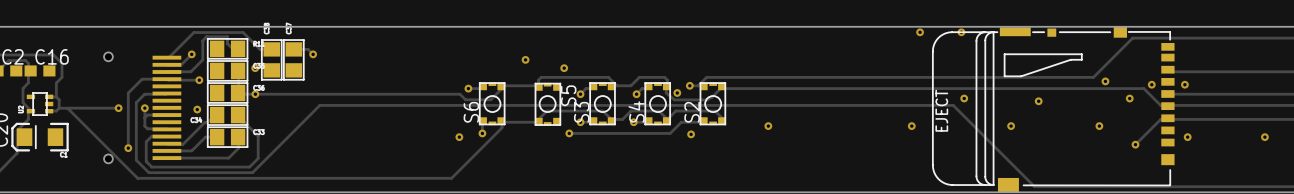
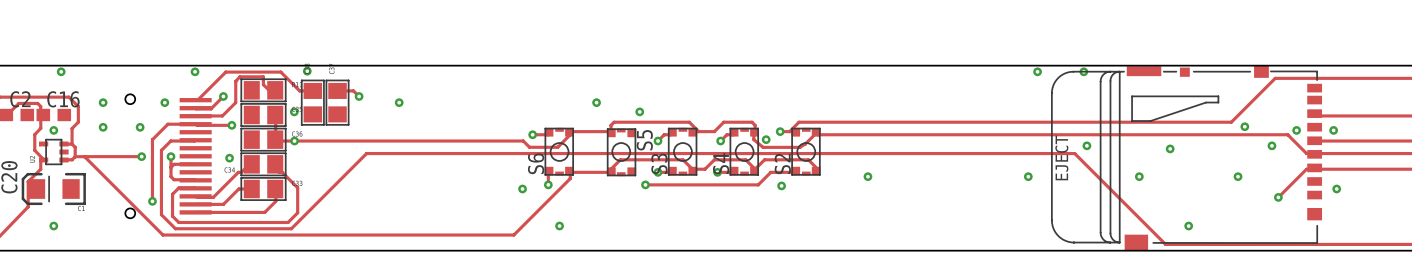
via: none -> (307, 71)
via: none -> (61, 71)
via: none -> (195, 71)
via: none -> (103, 102)
via: none -> (164, 102)
via: none -> (399, 102)
via: none -> (103, 127)
via: none -> (140, 127)
via: none -> (53, 130)
via: none -> (53, 226)
via: none -> (559, 226)
via: none -> (1188, 226)

